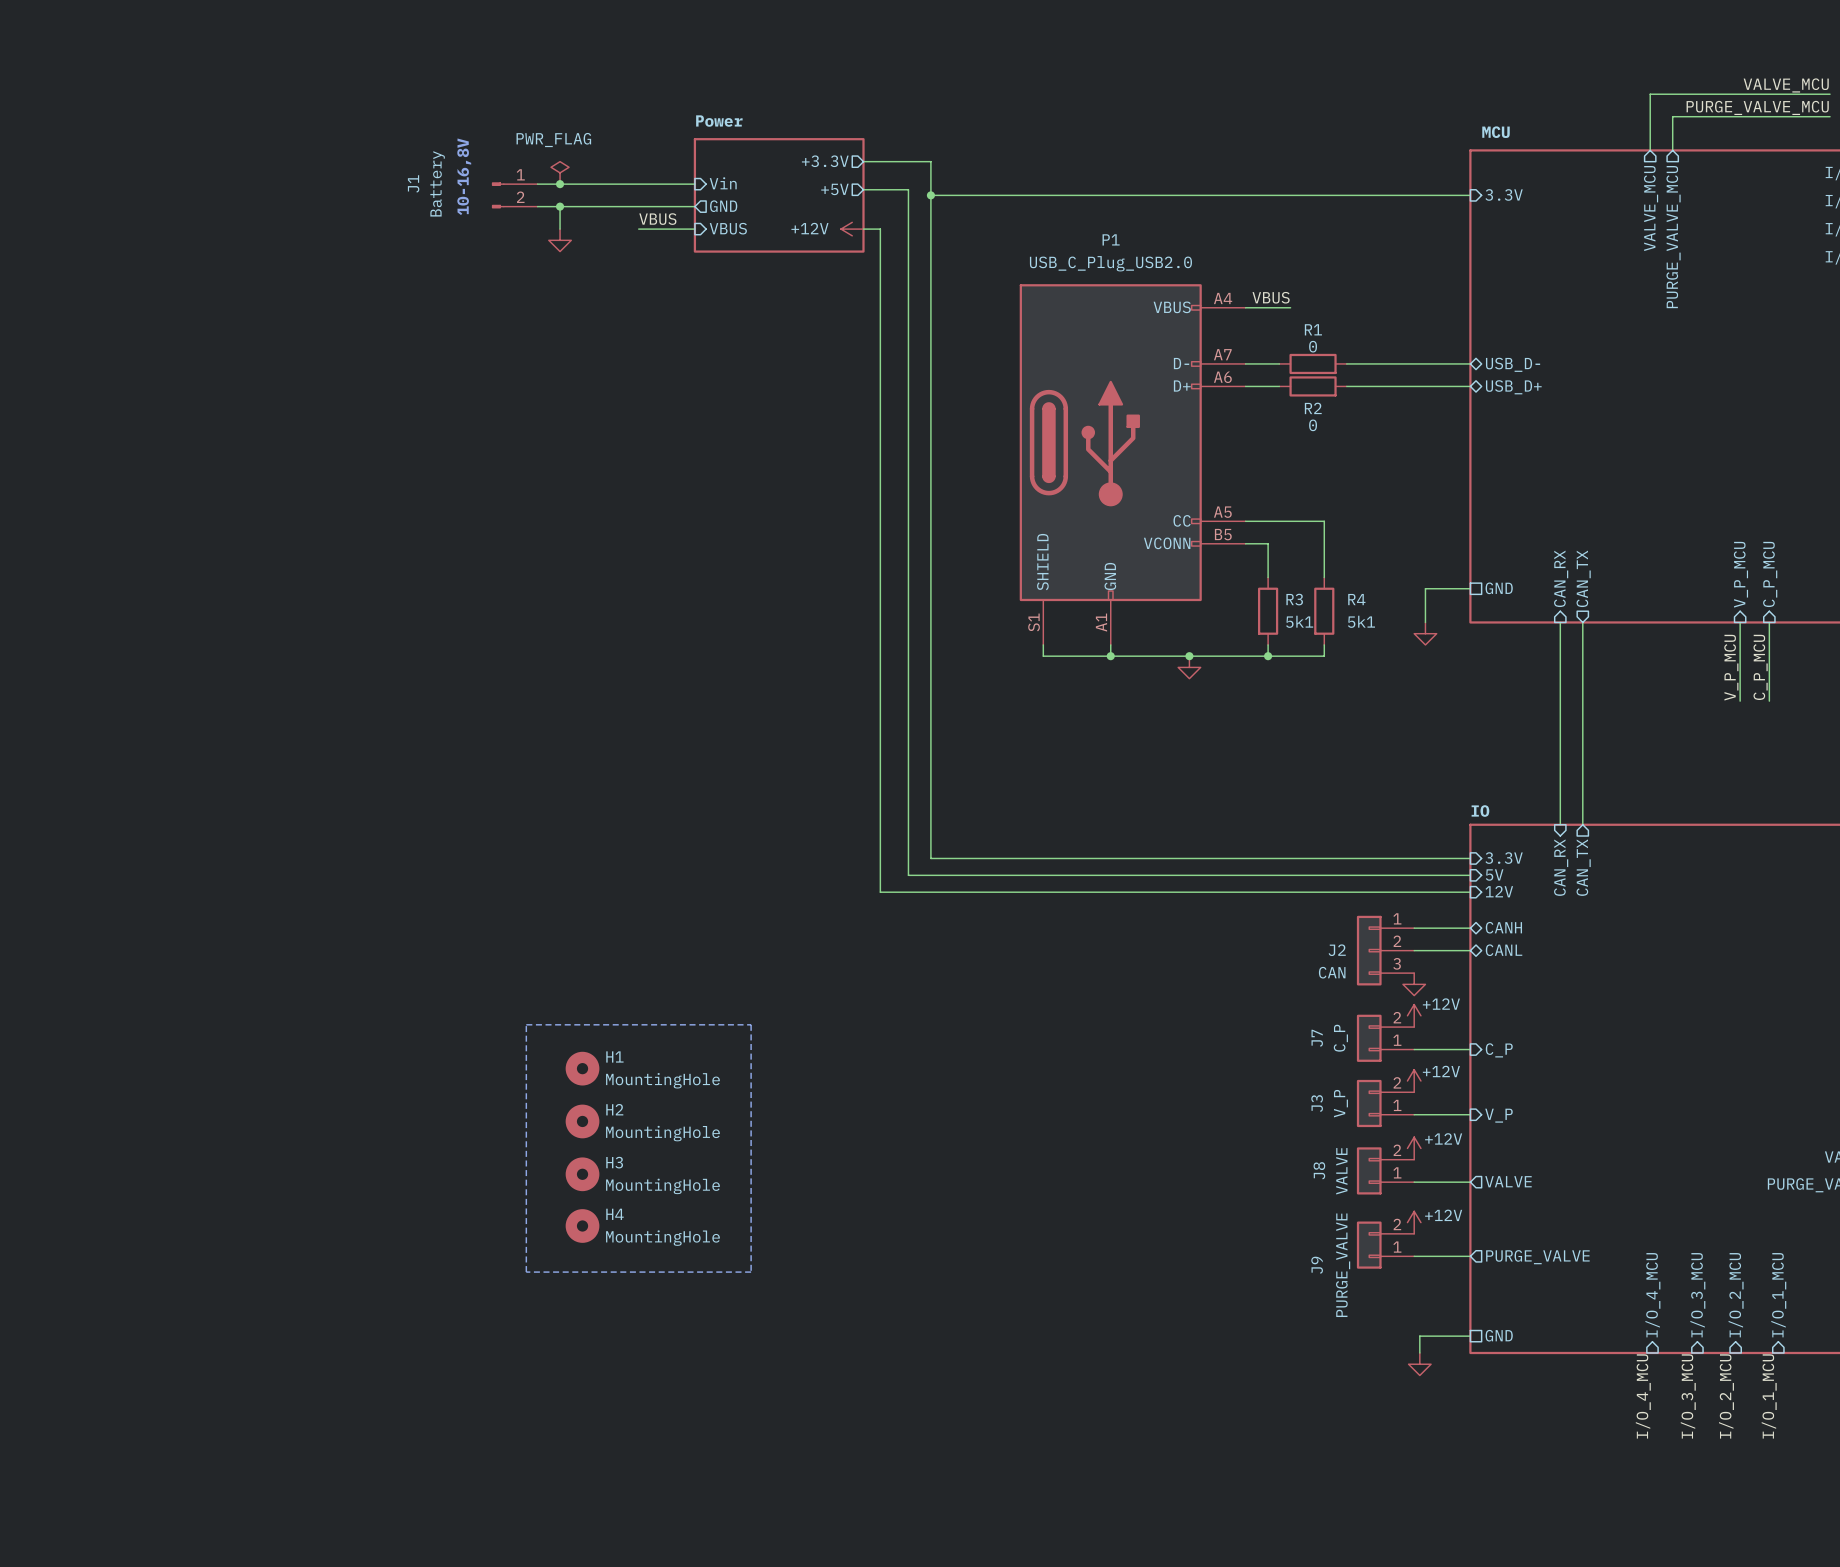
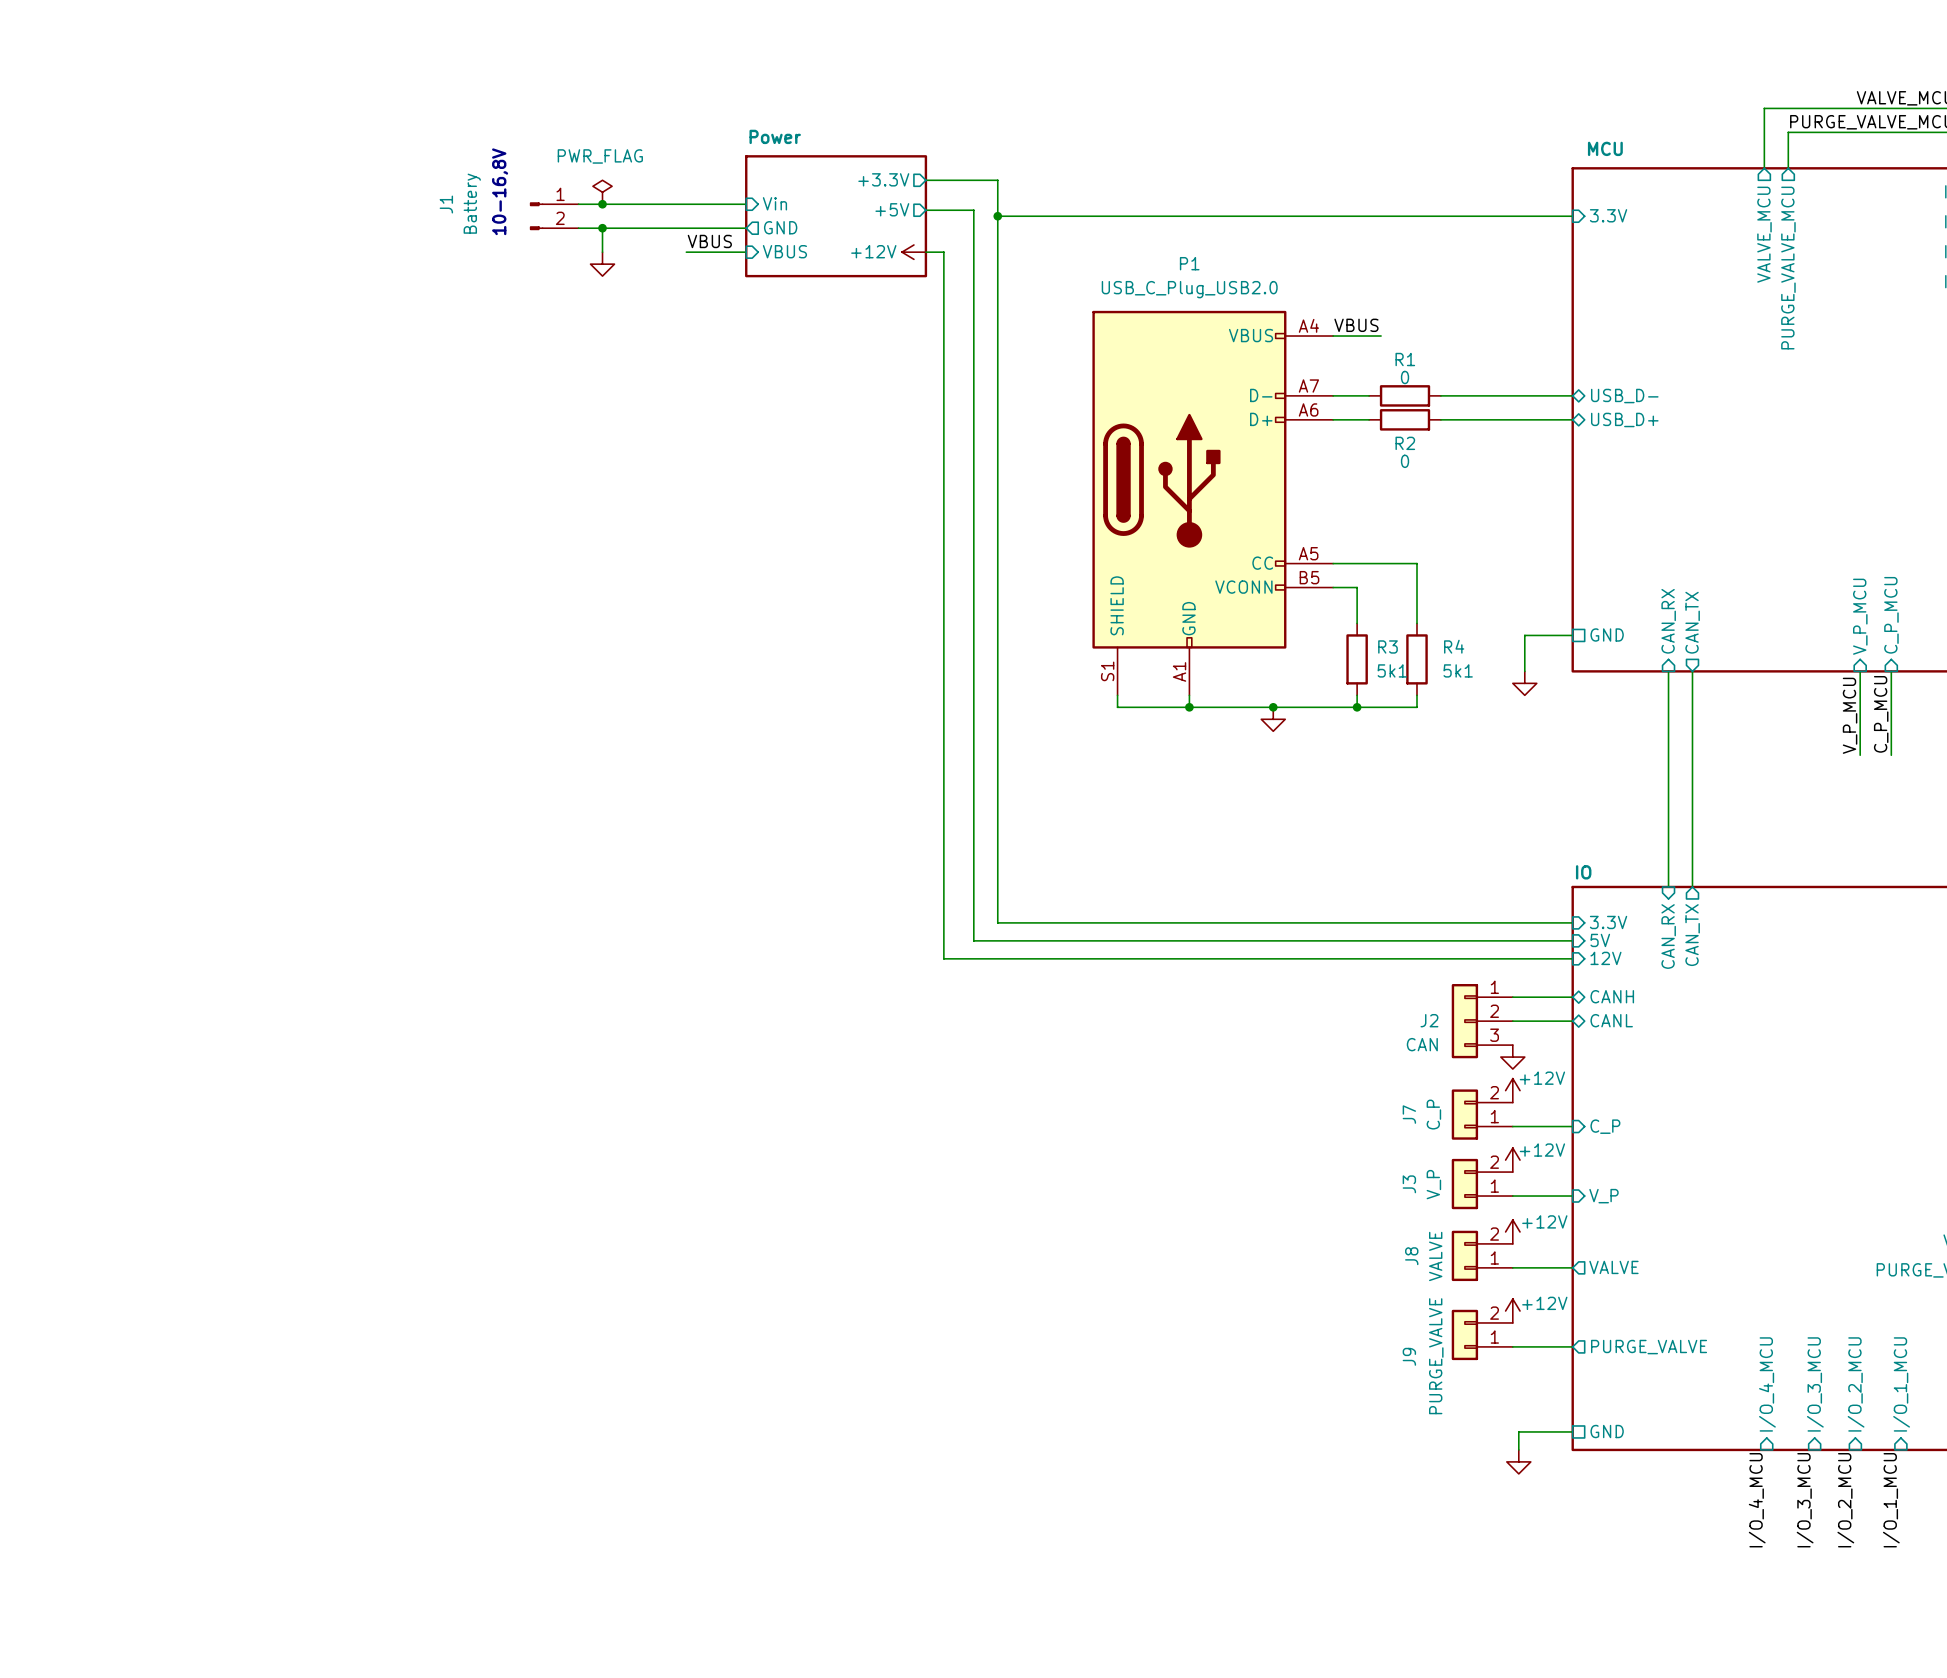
line: (526, 1024) (751, 1024) (751, 1272) (526, 1272) (526, 1024) -> none
H1: MountingHole (582, 1068) -> none
H2: MountingHole (582, 1121) -> none
H3: MountingHole (582, 1174) -> none
H4: MountingHole (582, 1225) -> none

